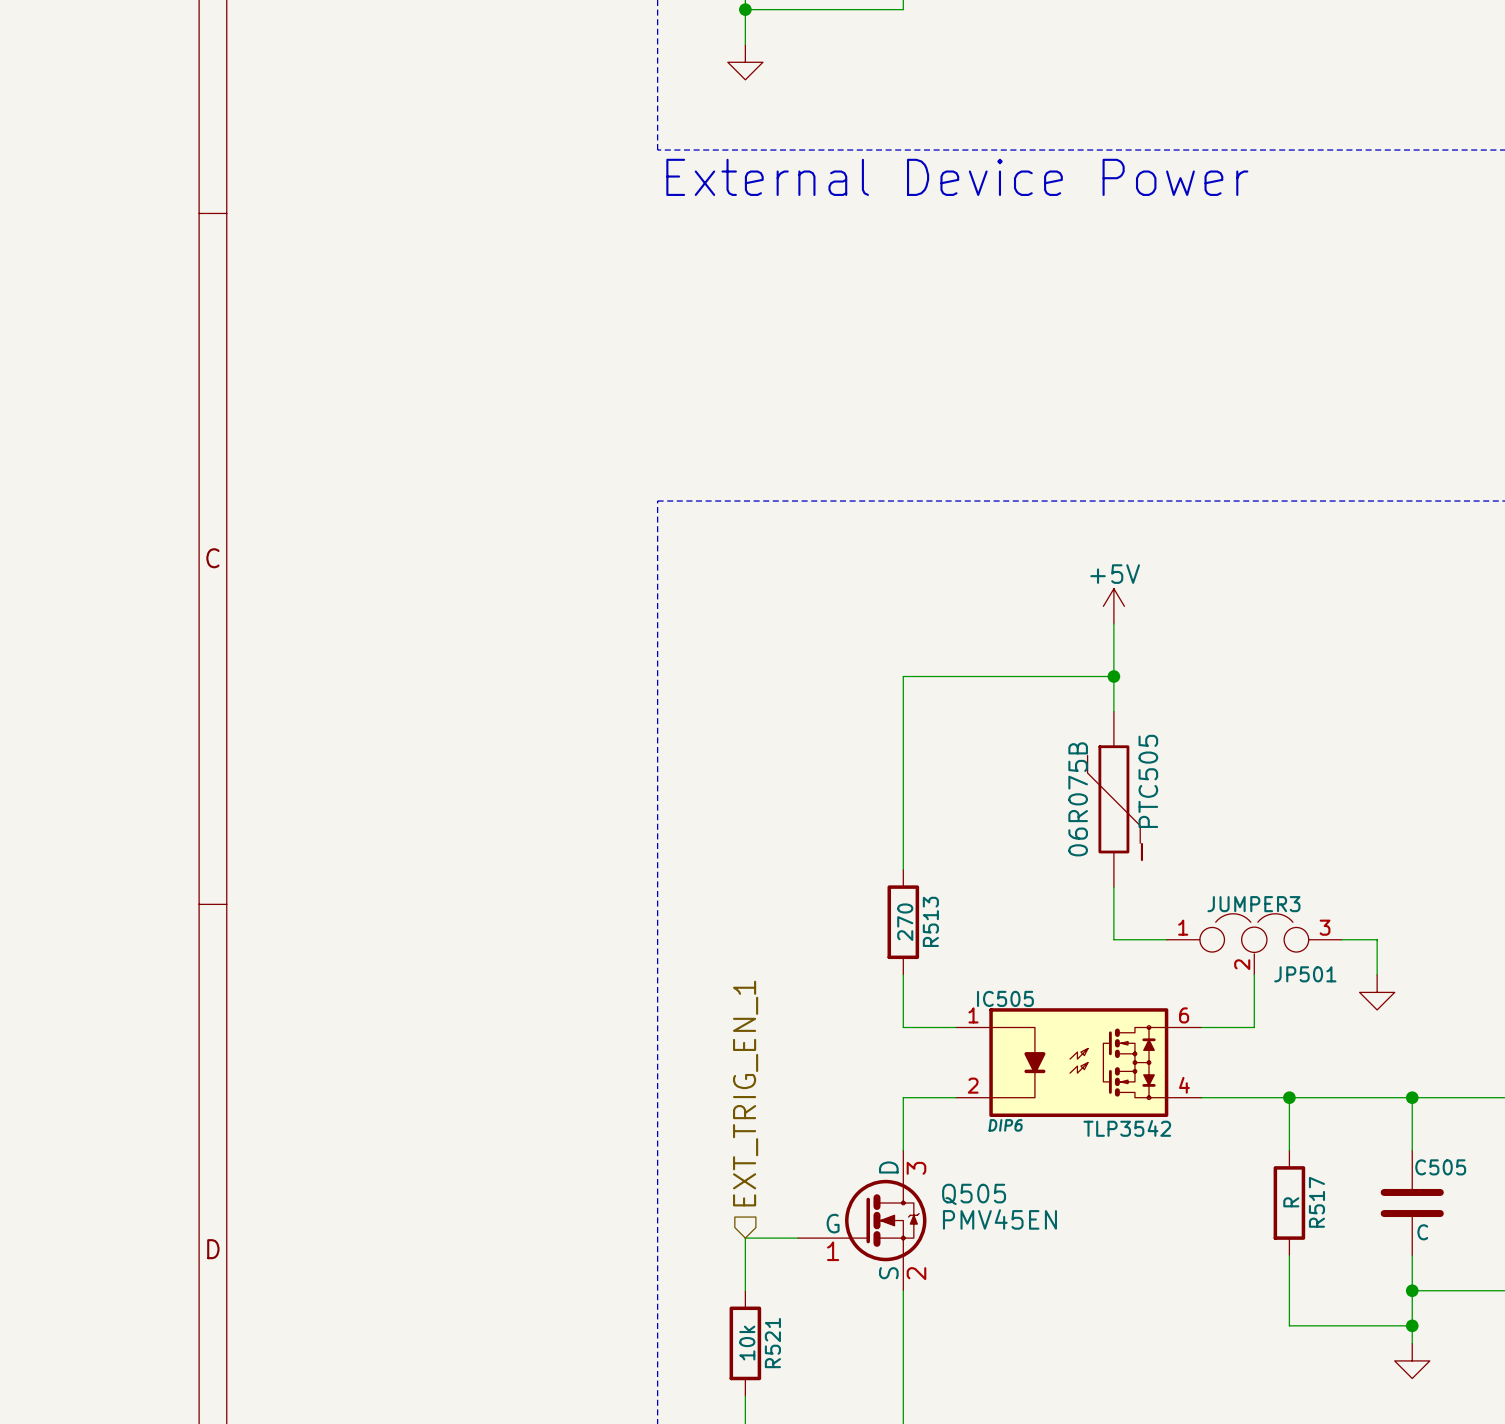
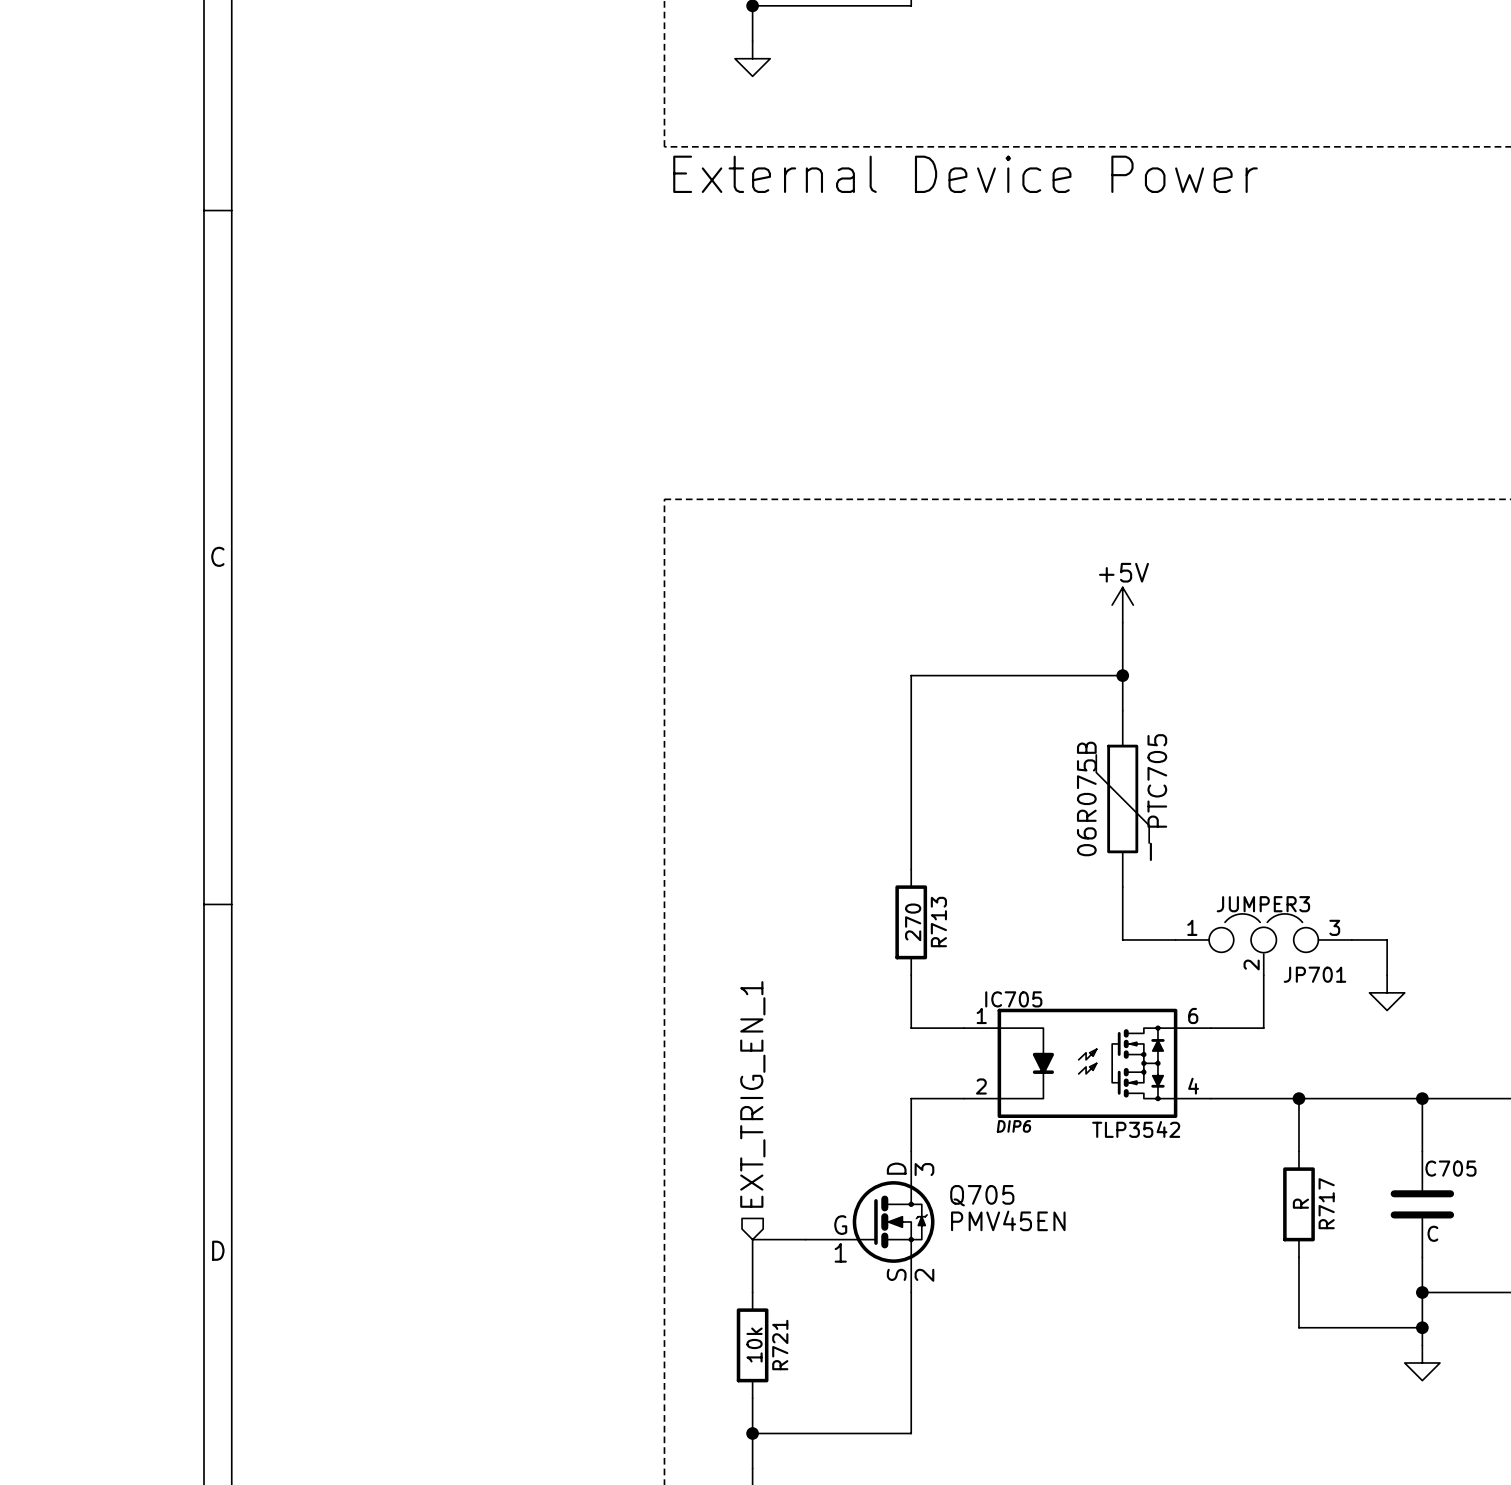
PTC505 name: PTC505 (1148, 781) -> PTC705 (1157, 780)
R513 name: R513 (930, 921) -> R713 (938, 922)
JP501 name: JP501 (1305, 974) -> JP701 (1314, 974)
IC505 name: IC505 (1005, 998) -> IC705 (1013, 999)
C505 name: C505 (1440, 1167) -> C705 (1450, 1168)
Q505 name: Q505 (974, 1194) -> Q705 (982, 1195)
R517 name: R517 (1316, 1202) -> R717 (1326, 1203)
R521 name: R521 (772, 1343) -> R721 (780, 1345)

